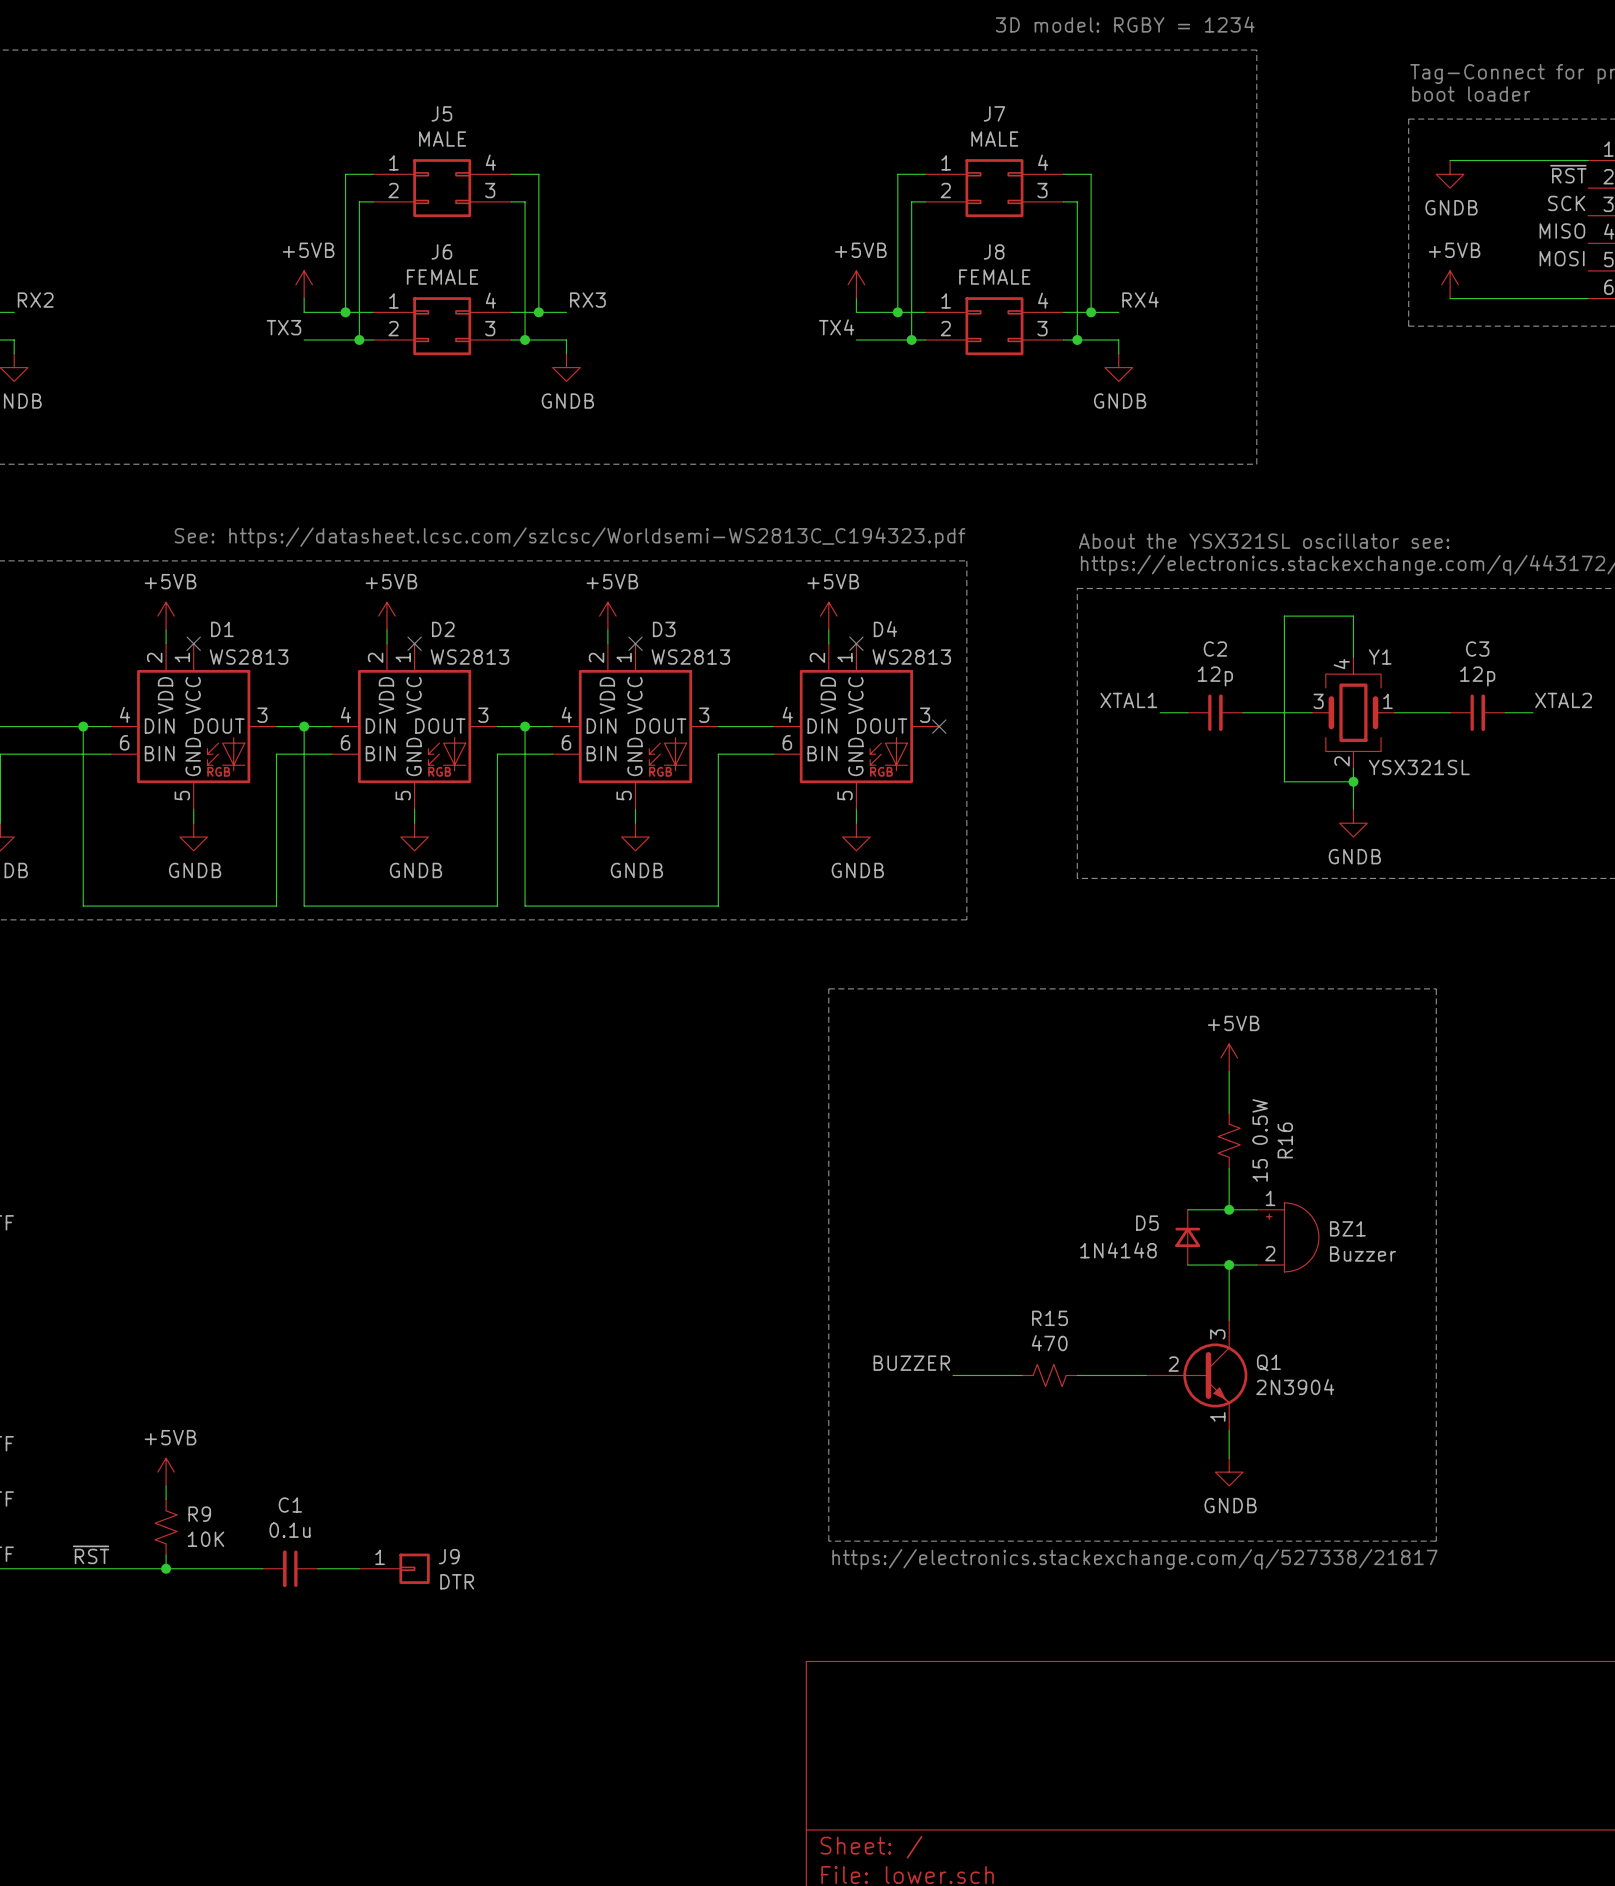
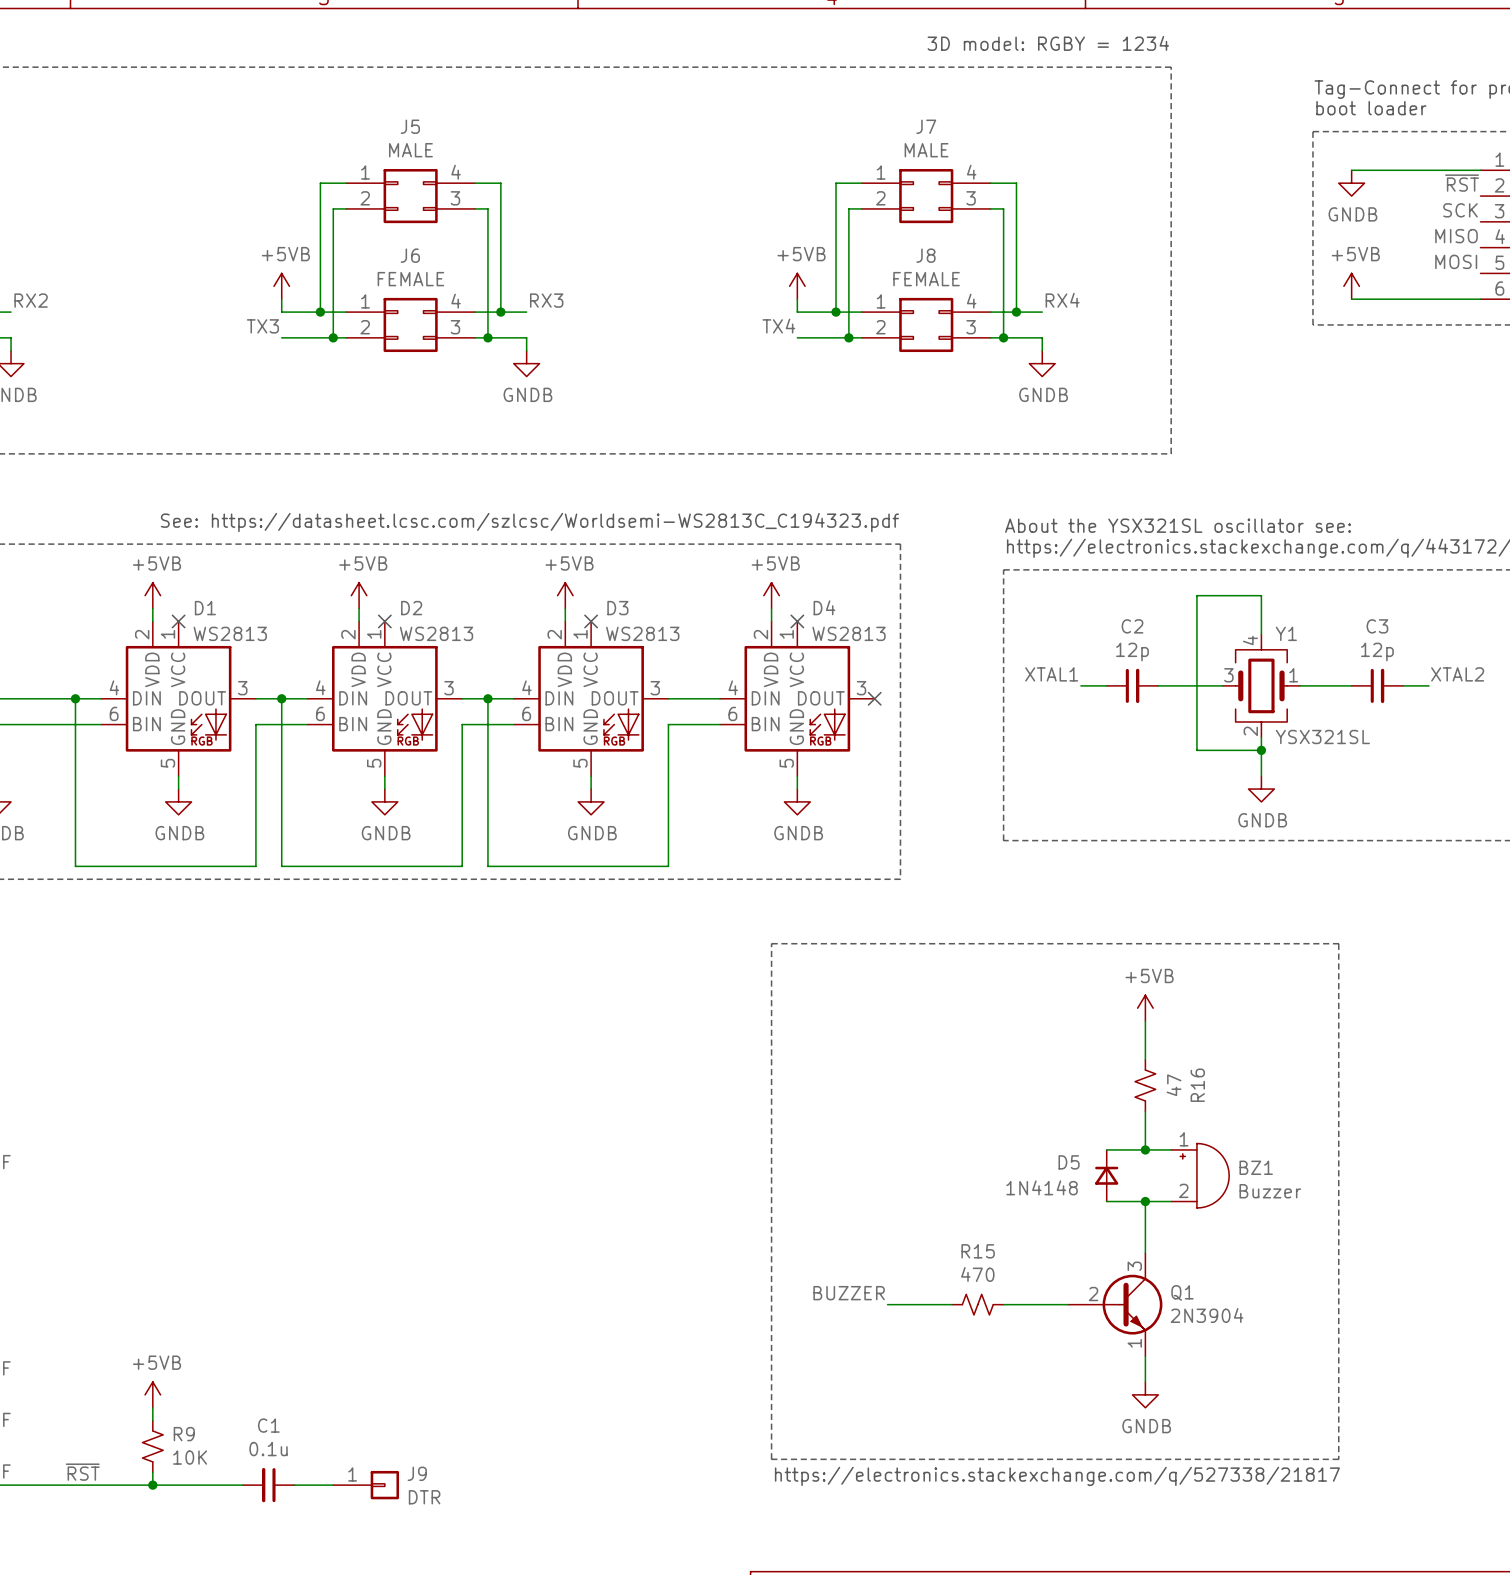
R16 value: 15 0.5W (1260, 1140) -> 47 (1173, 1085)

